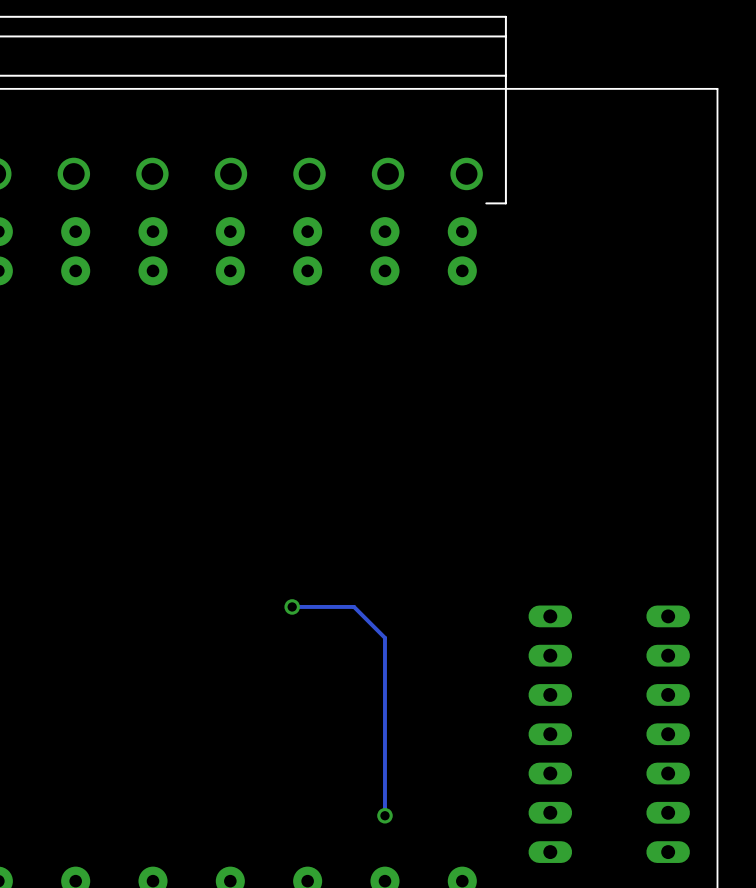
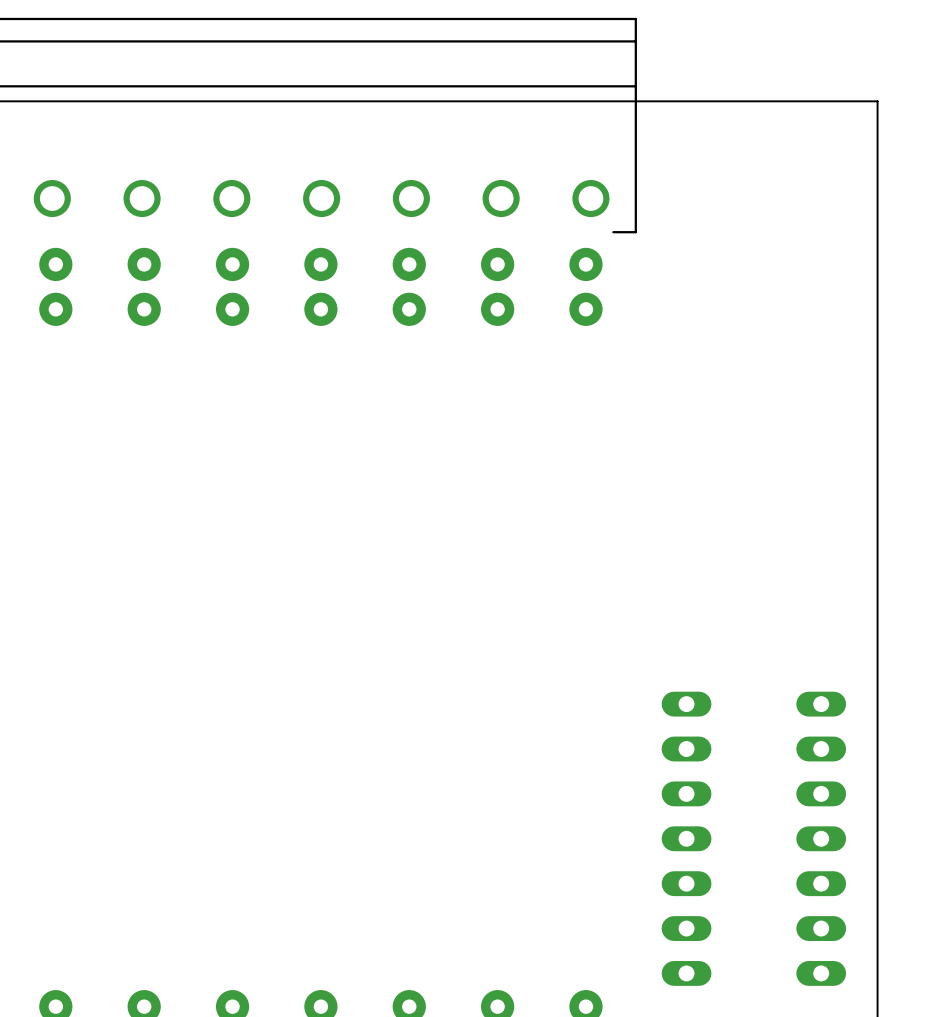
track: (292, 606) (354, 606) (384, 637) (384, 815) -> none
via: (292, 606) -> none
via: (384, 815) -> none

